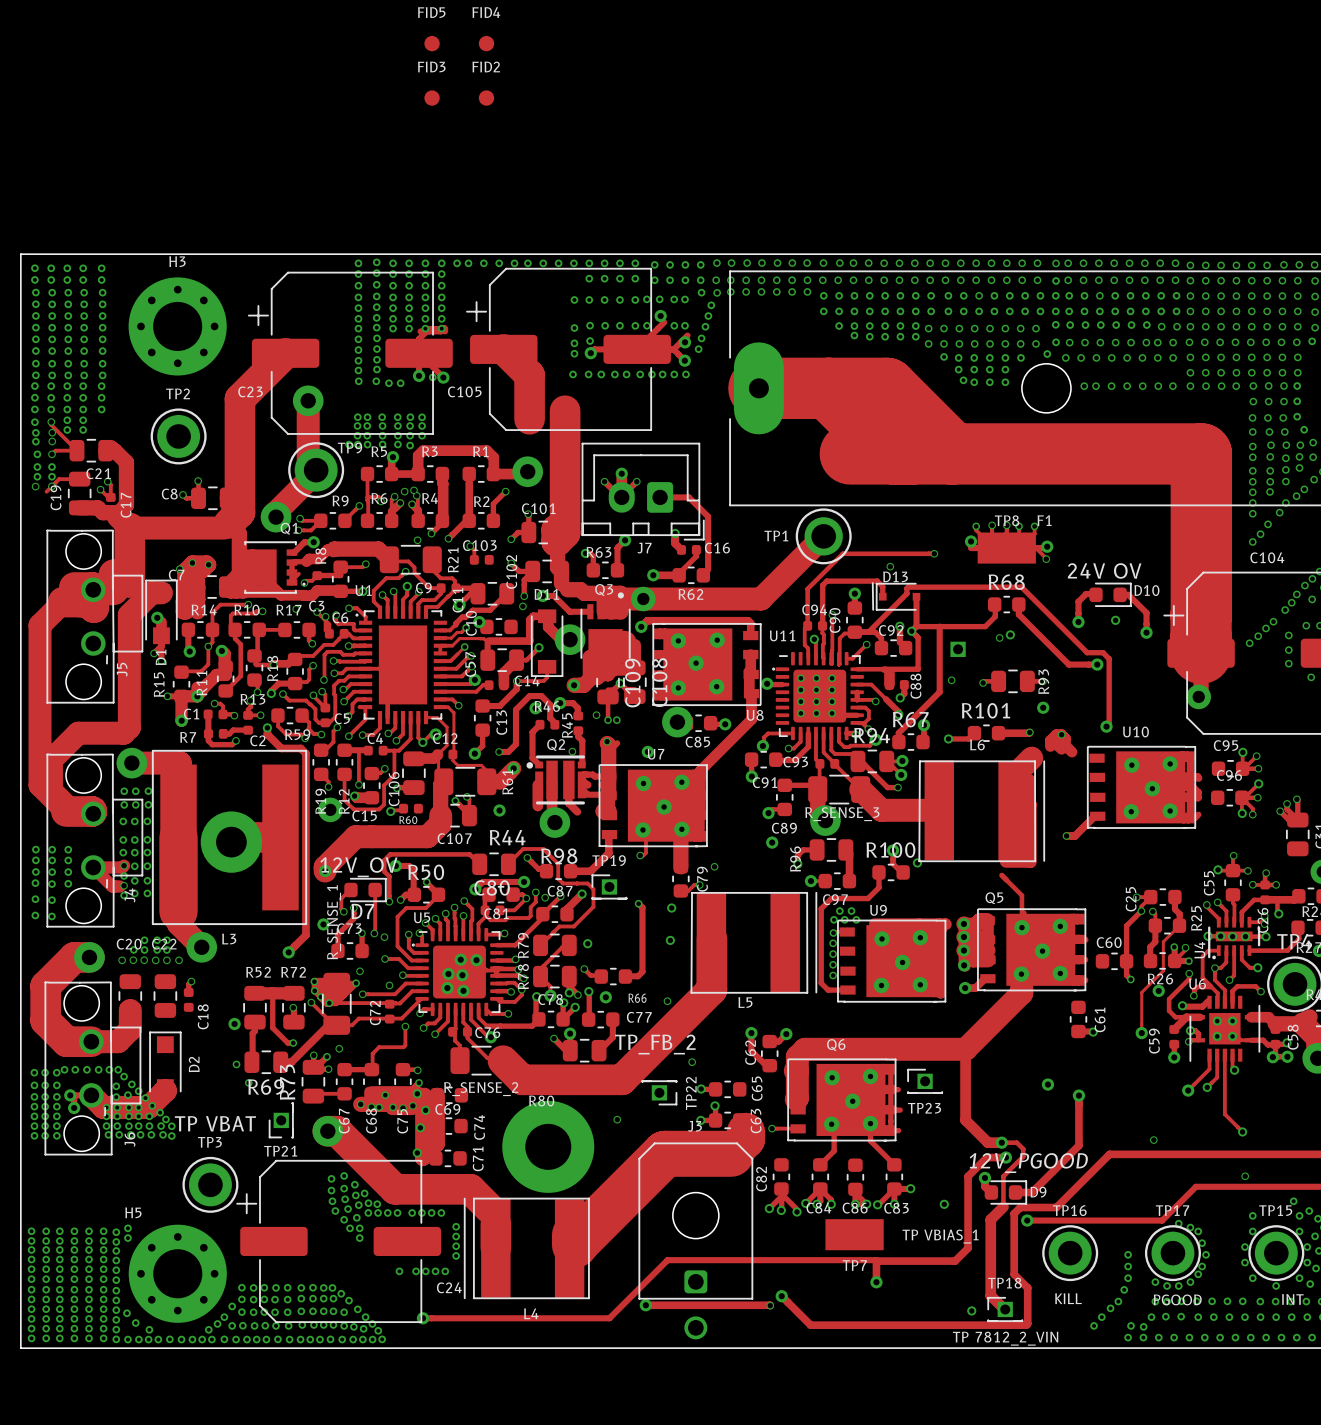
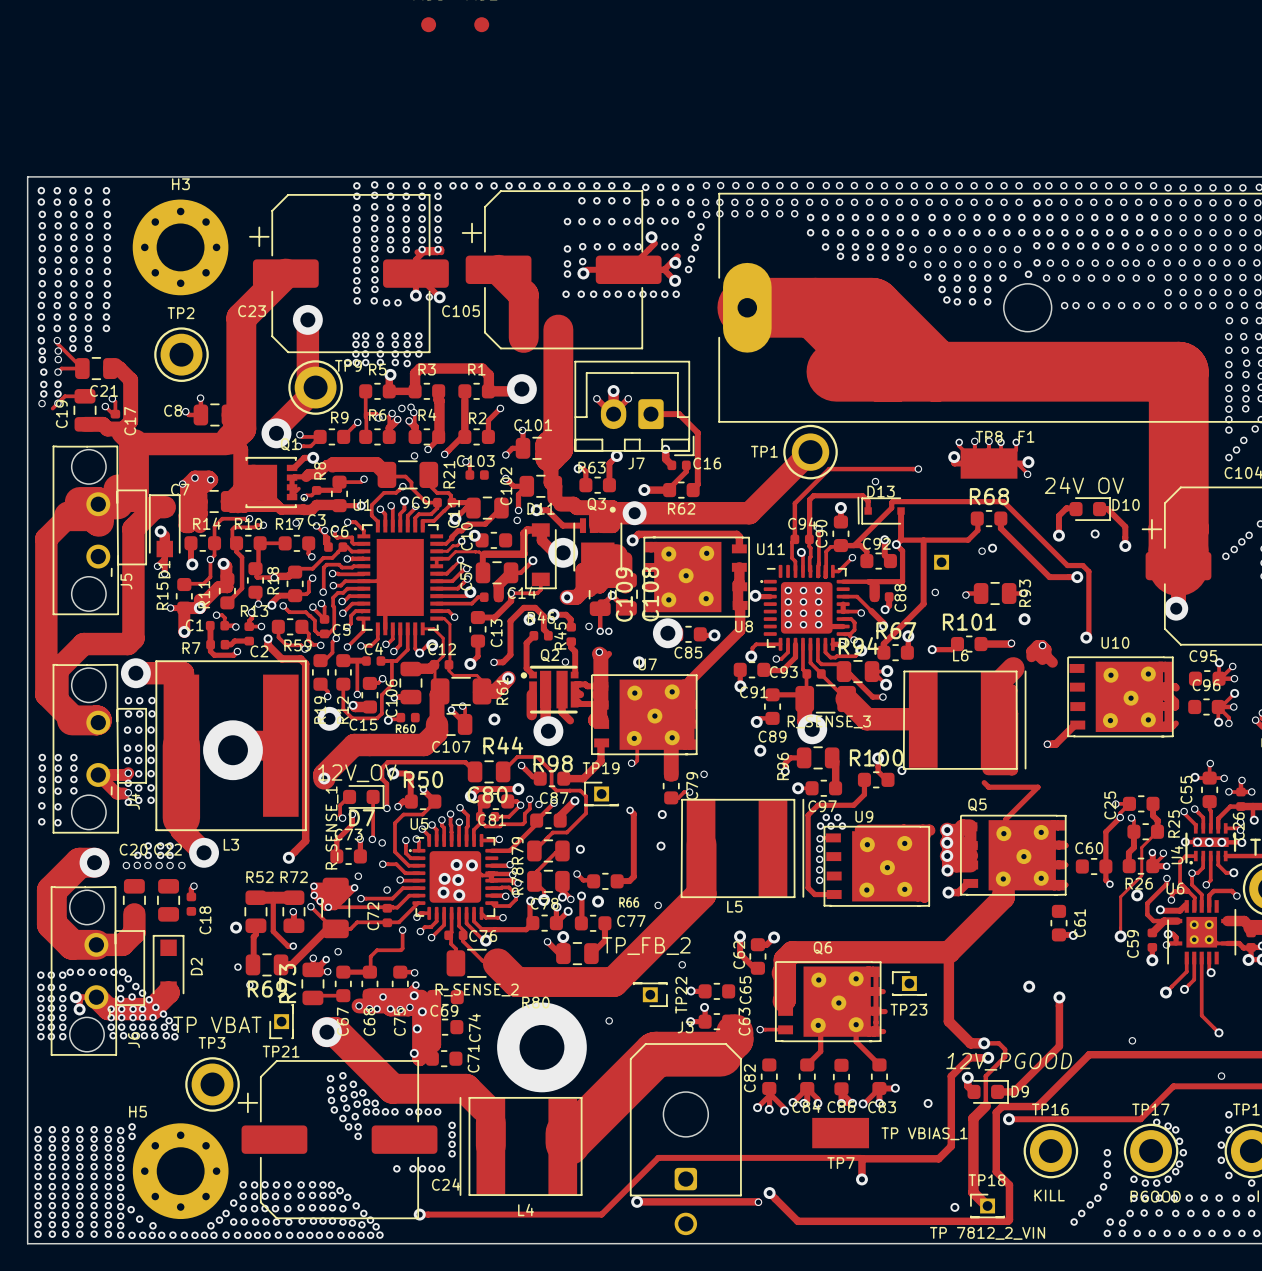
track: (1006, 880) (1021, 895) (1020, 926) -> (988, 787) (1037, 787) (1005, 819)
via: (323, 924) -> none

